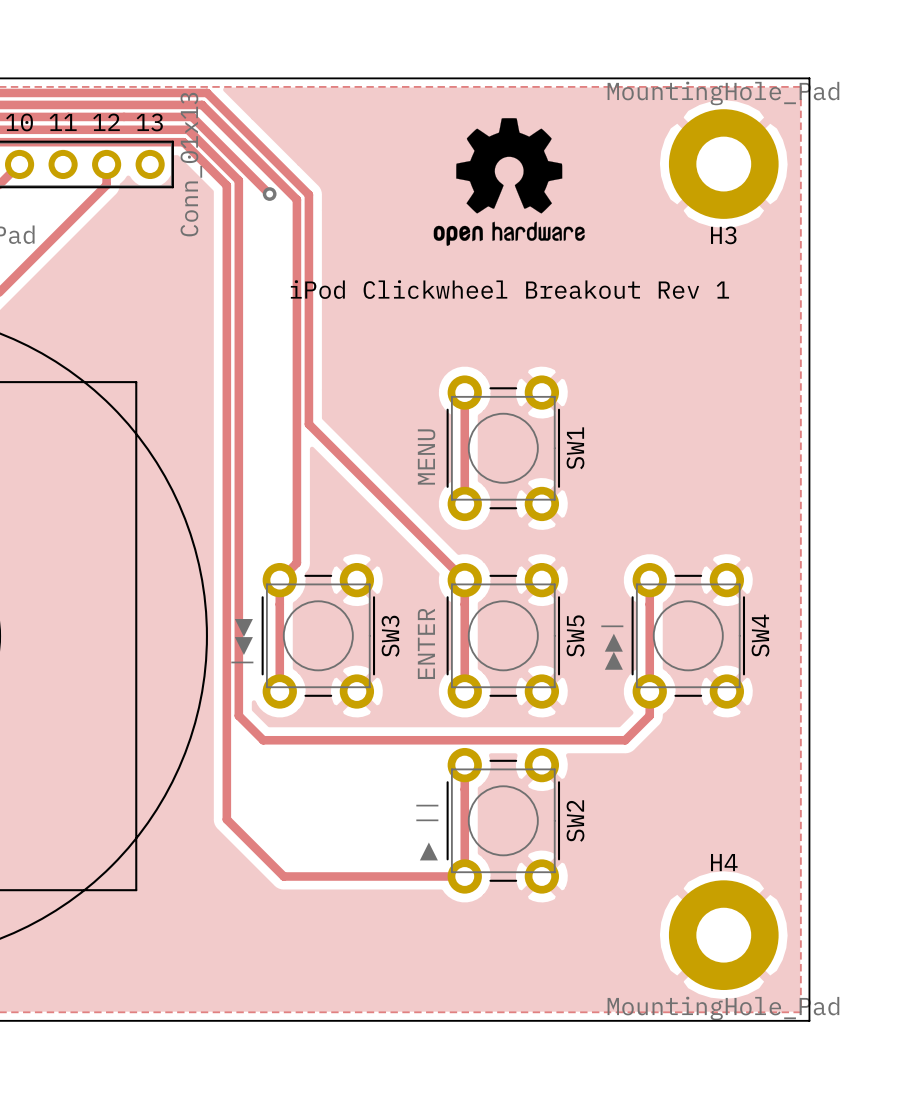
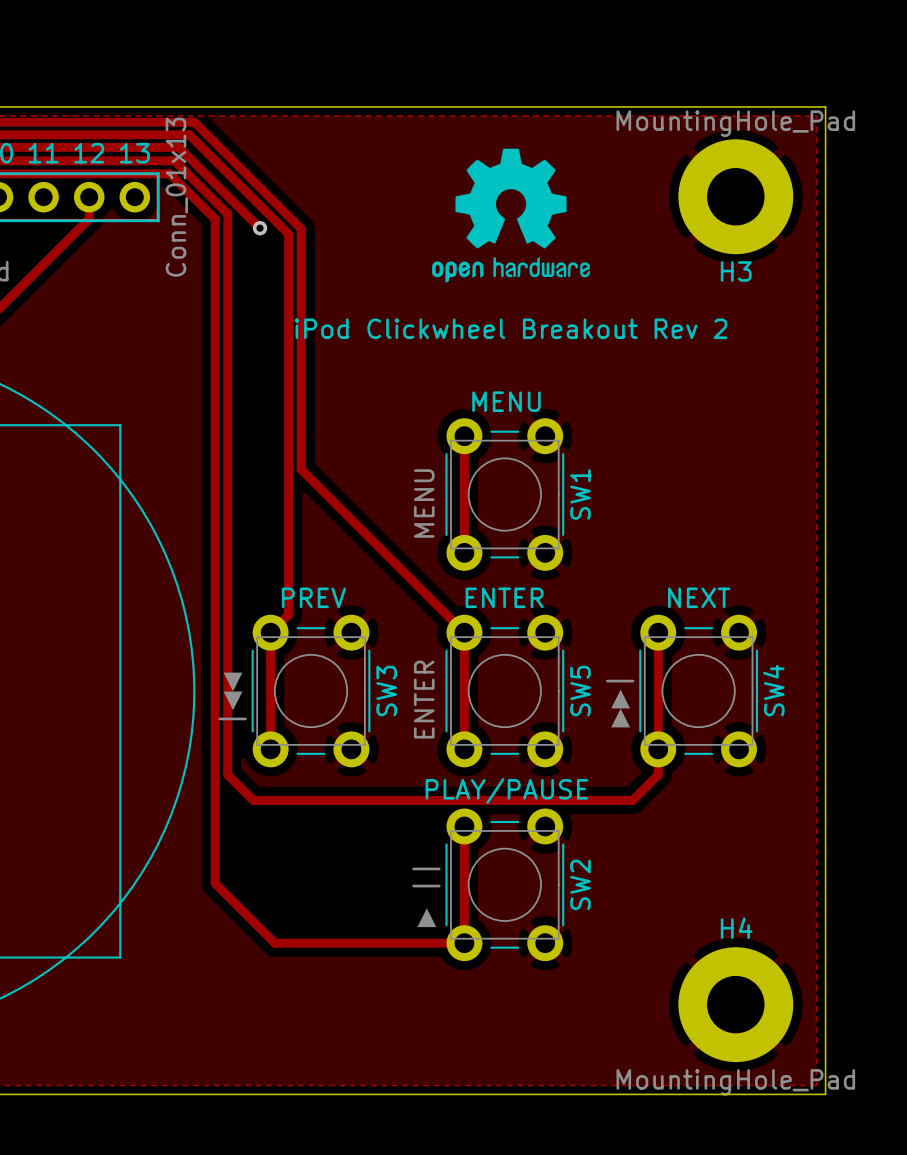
text: iPod Clickwheel Breakout Rev 1 (509, 289) -> iPod Clickwheel Breakout Rev 2 (511, 328)
text: none -> MENU (506, 401)
text: none -> PREV (313, 597)
text: none -> ENTER (504, 597)
text: none -> NEXT (699, 597)
text: none -> PLAY/PAUSE (506, 791)

